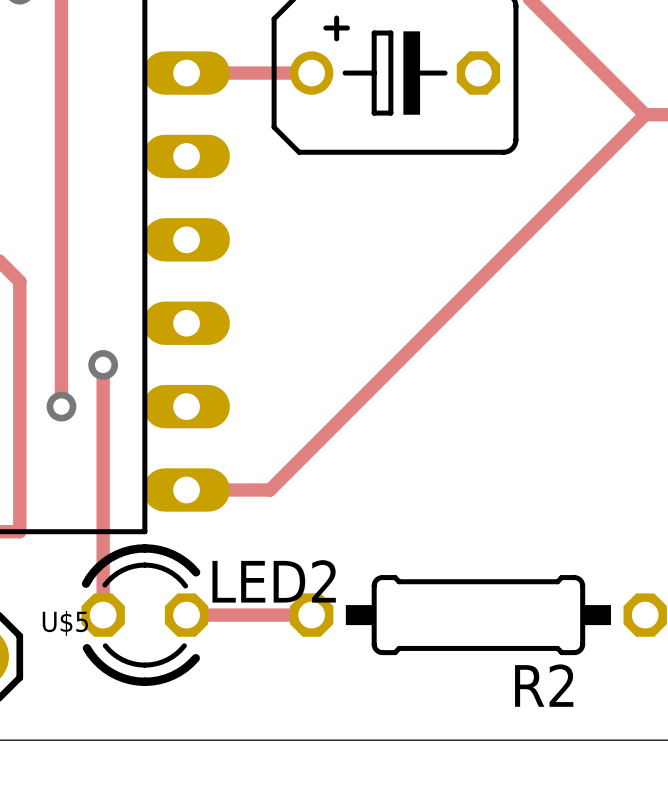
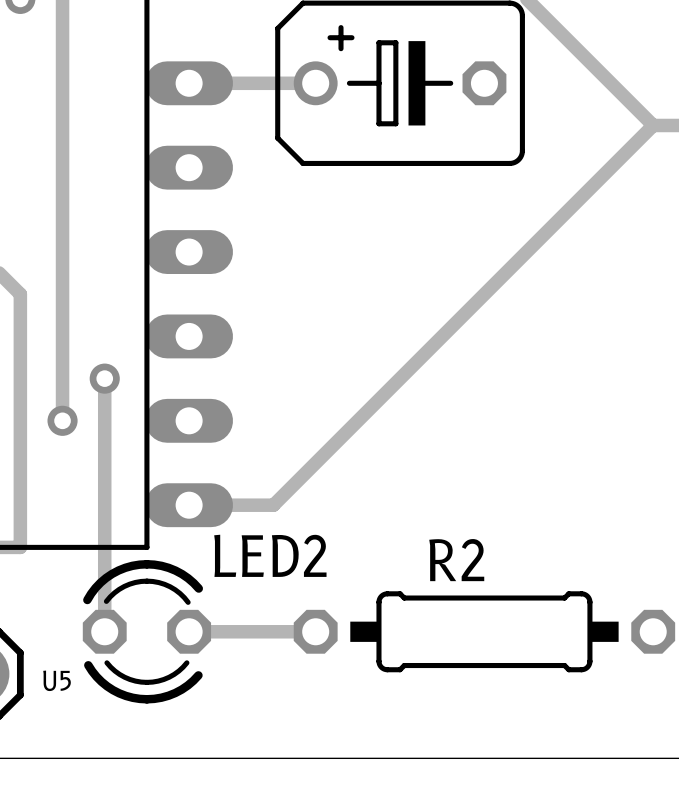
LED2 name position: LED2 (274, 581) -> LED2 (270, 555)
U$5 name: U$5 (65, 623) -> U5 (57, 680)
R2 name position: R2 (544, 685) -> R2 (456, 560)

